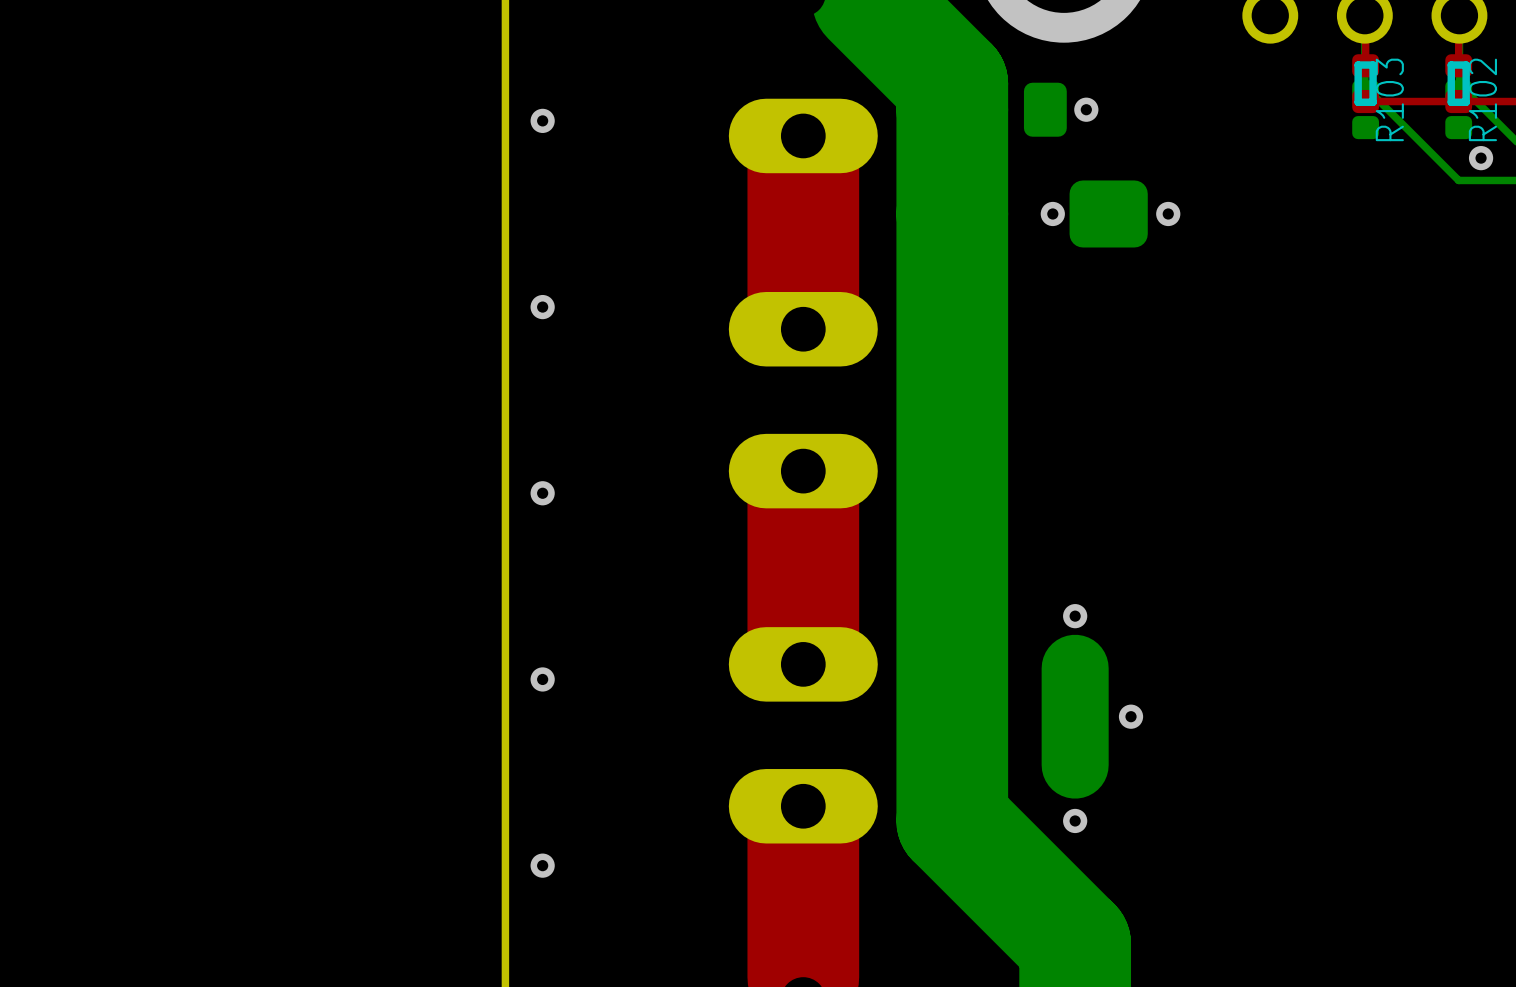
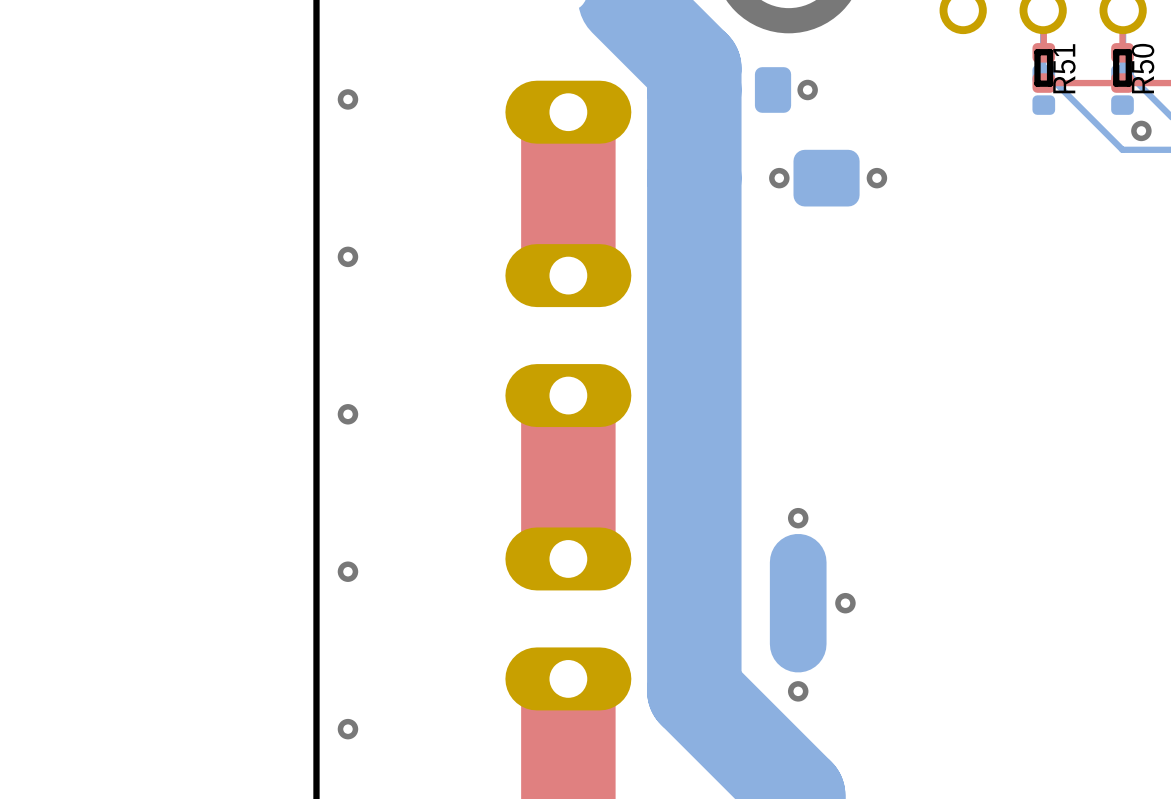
R103 name: R103 (1389, 99) -> R51 (1064, 68)
R102 name: R102 (1482, 99) -> R50 (1142, 68)

